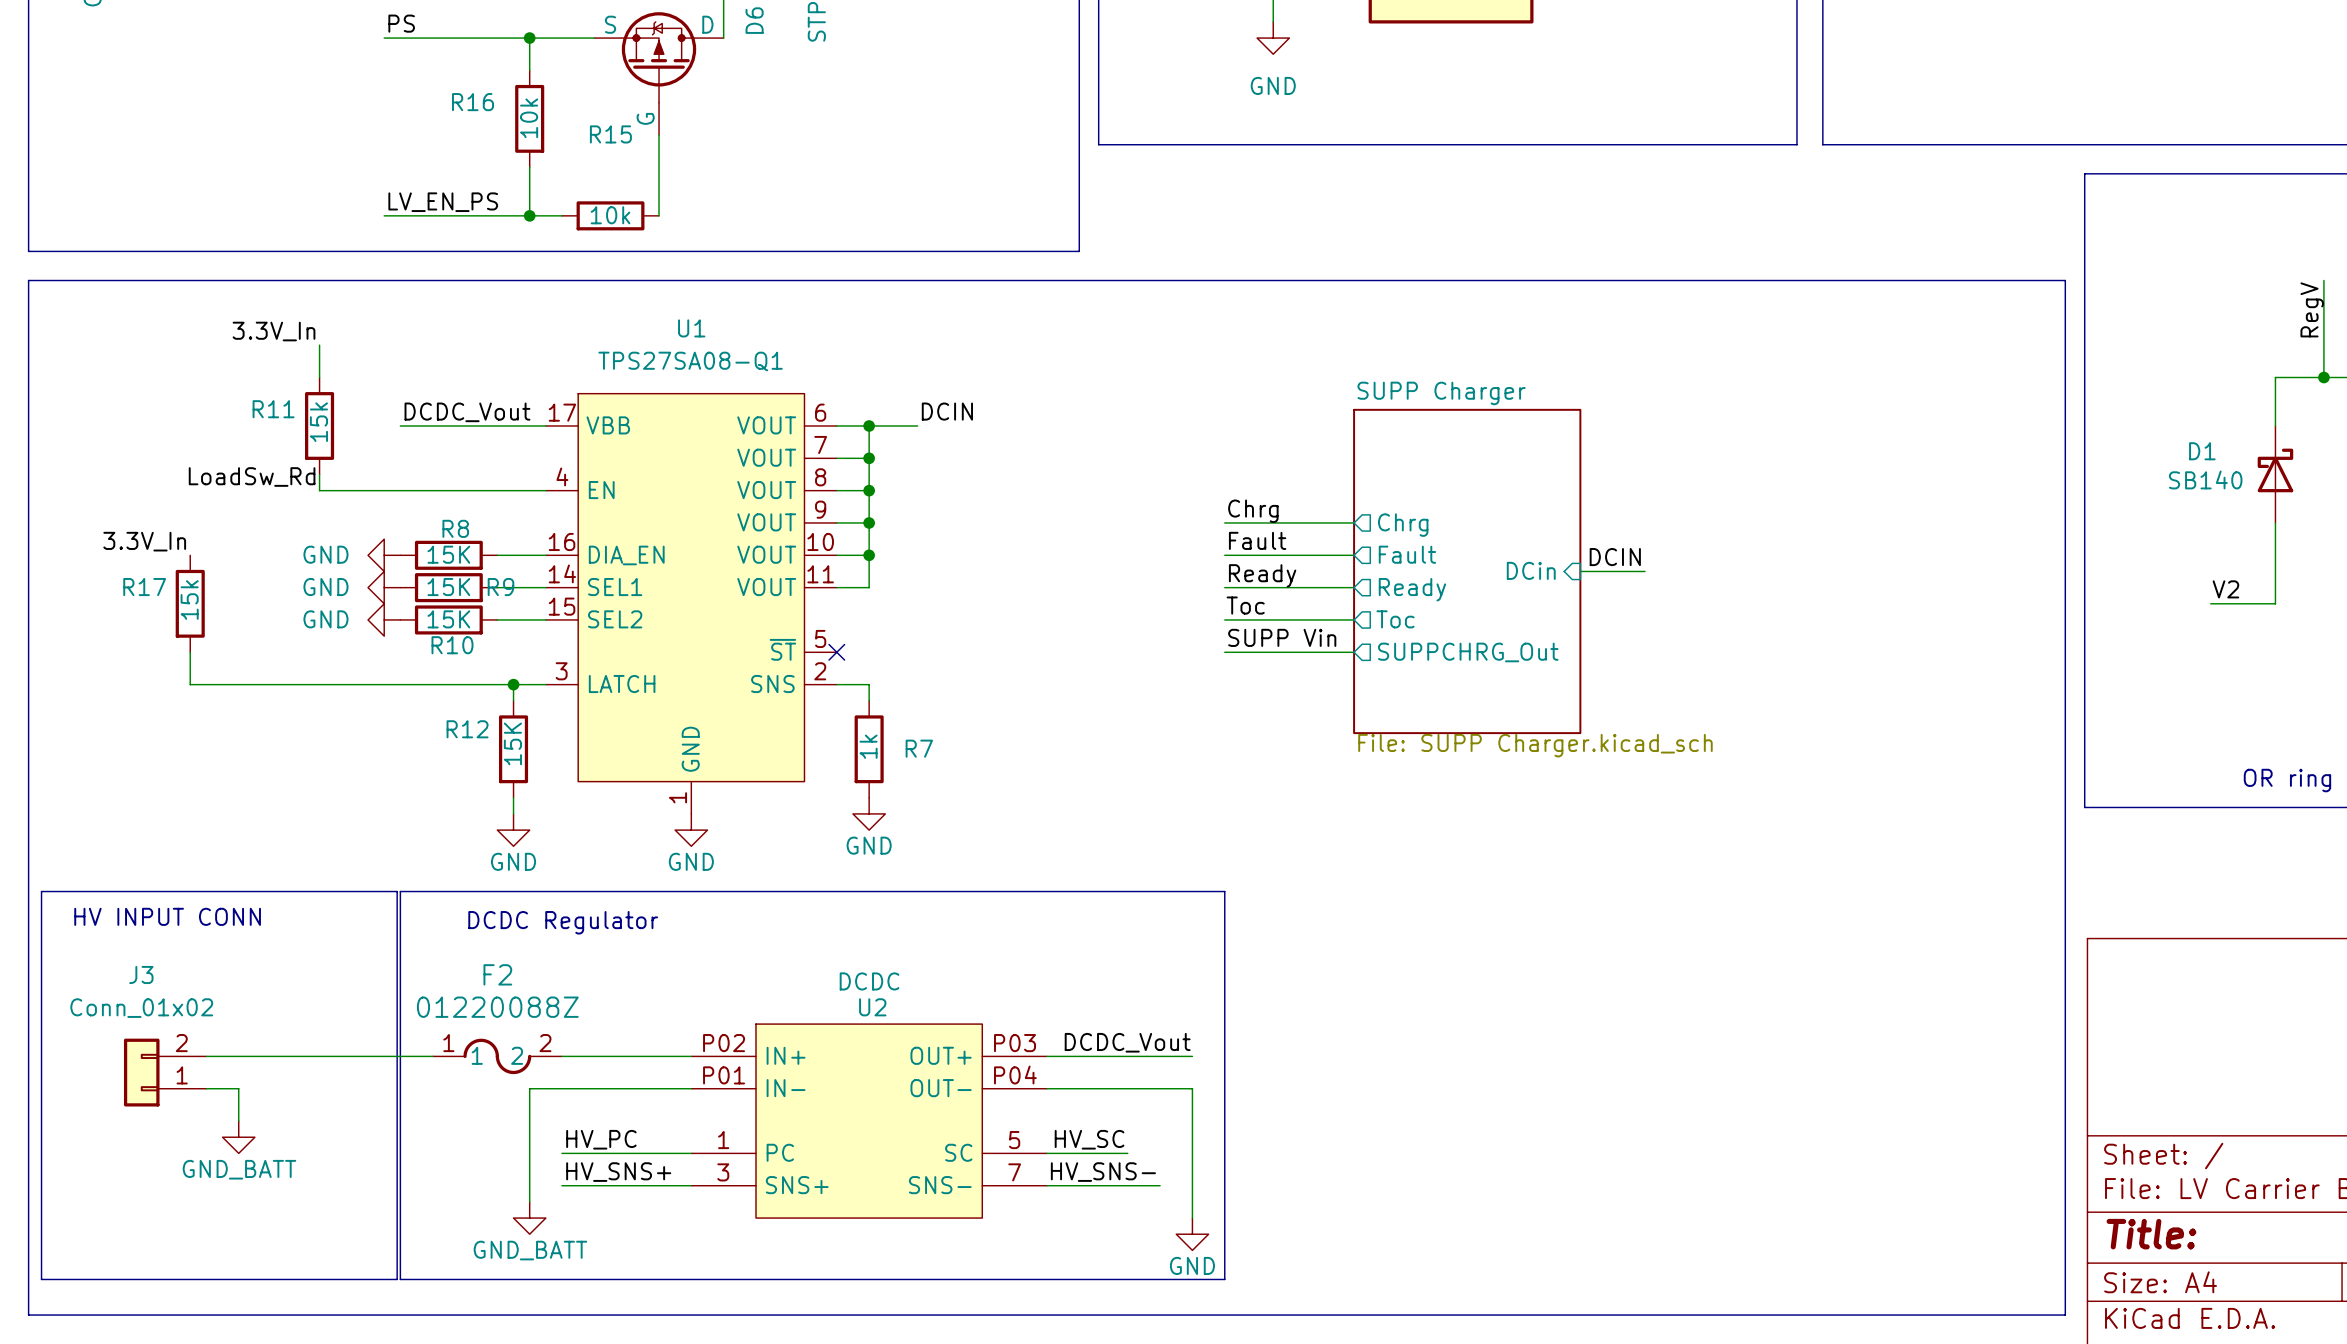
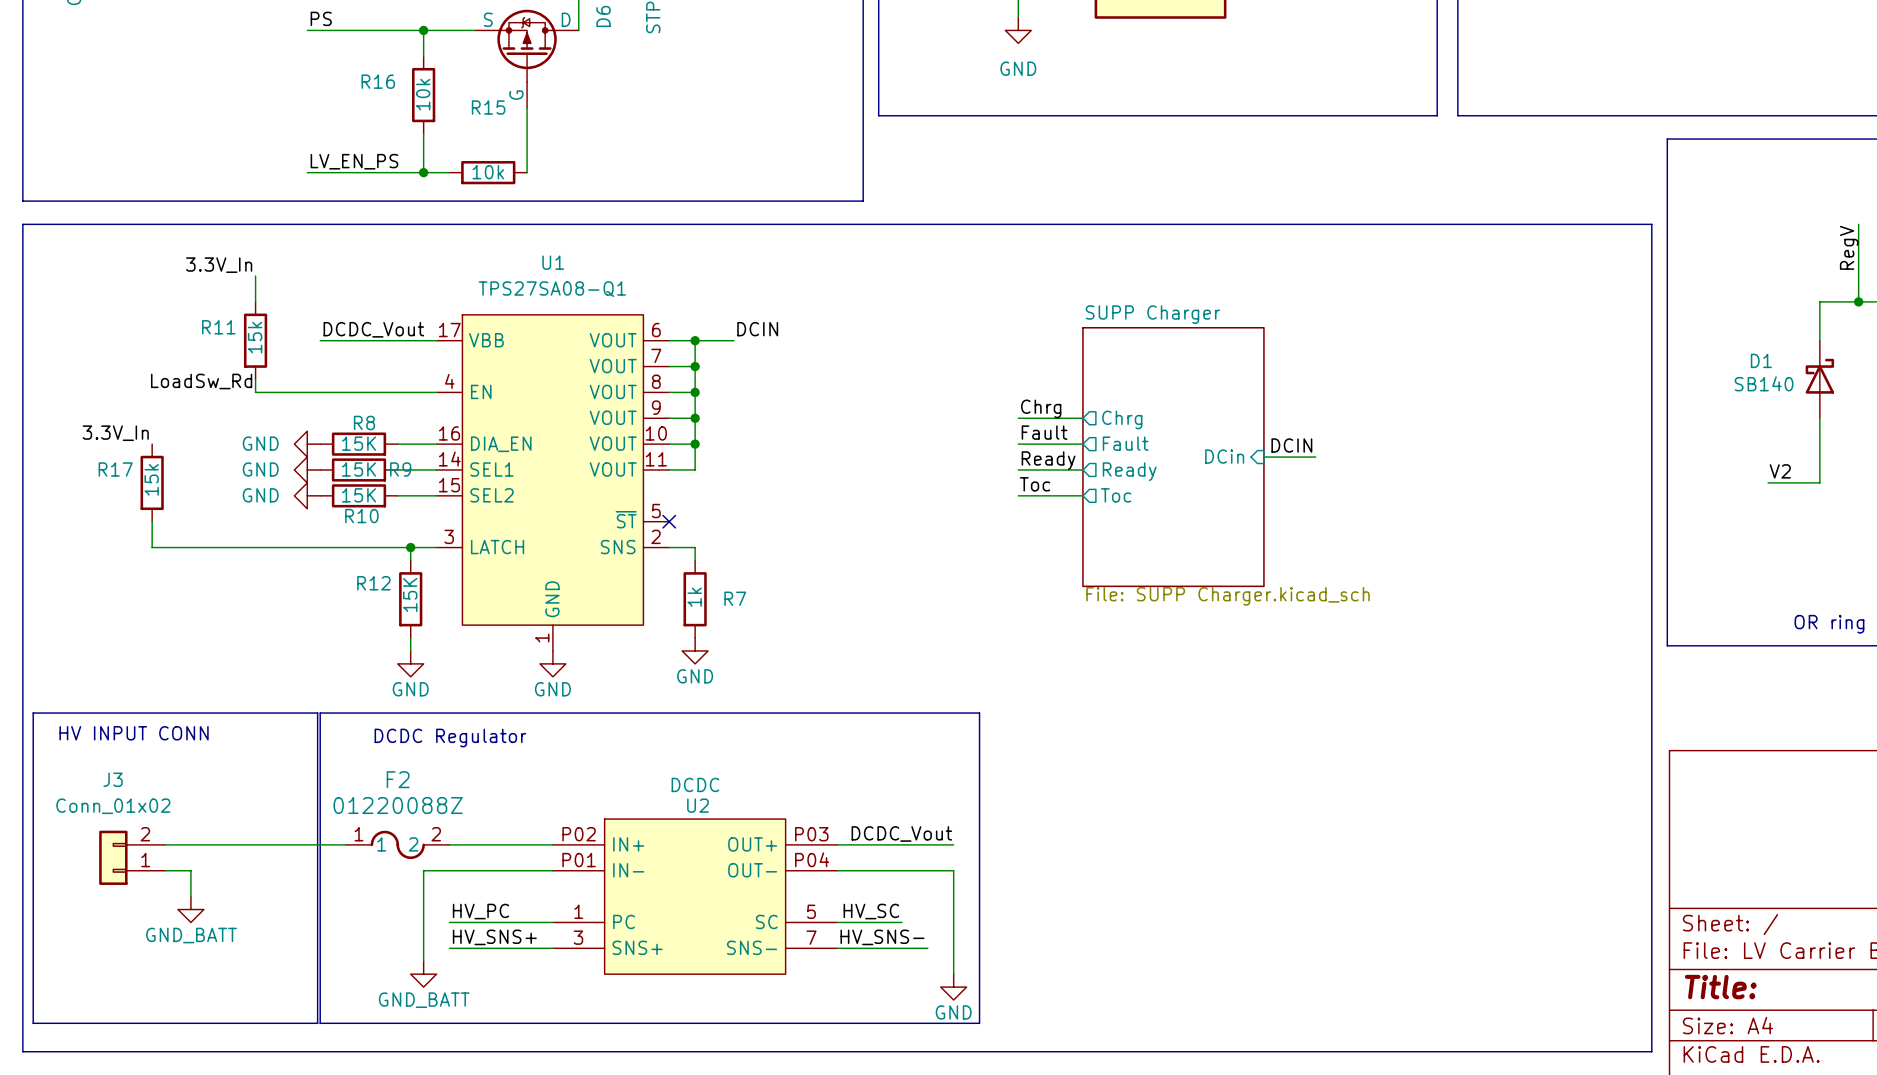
label position: Chrg (1253, 511) -> Chrg (1041, 408)
wire: (1224, 522) (1273, 522) -> none
label position: Fault (1257, 540) -> Fault (1044, 432)
wire: (1224, 555) (1273, 555) -> none
label position: Ready (1262, 575) -> Ready (1048, 460)
wire: (1224, 587) (1273, 587) -> none
label position: Toc (1245, 605) -> Toc (1035, 484)
wire: (1224, 619) (1273, 619) -> none
label: SUPP Vin (1282, 637) -> none
wire: (1224, 652) (1354, 652) -> none
sheet pin: SUPPCHRG_Out (1468, 652) -> none

